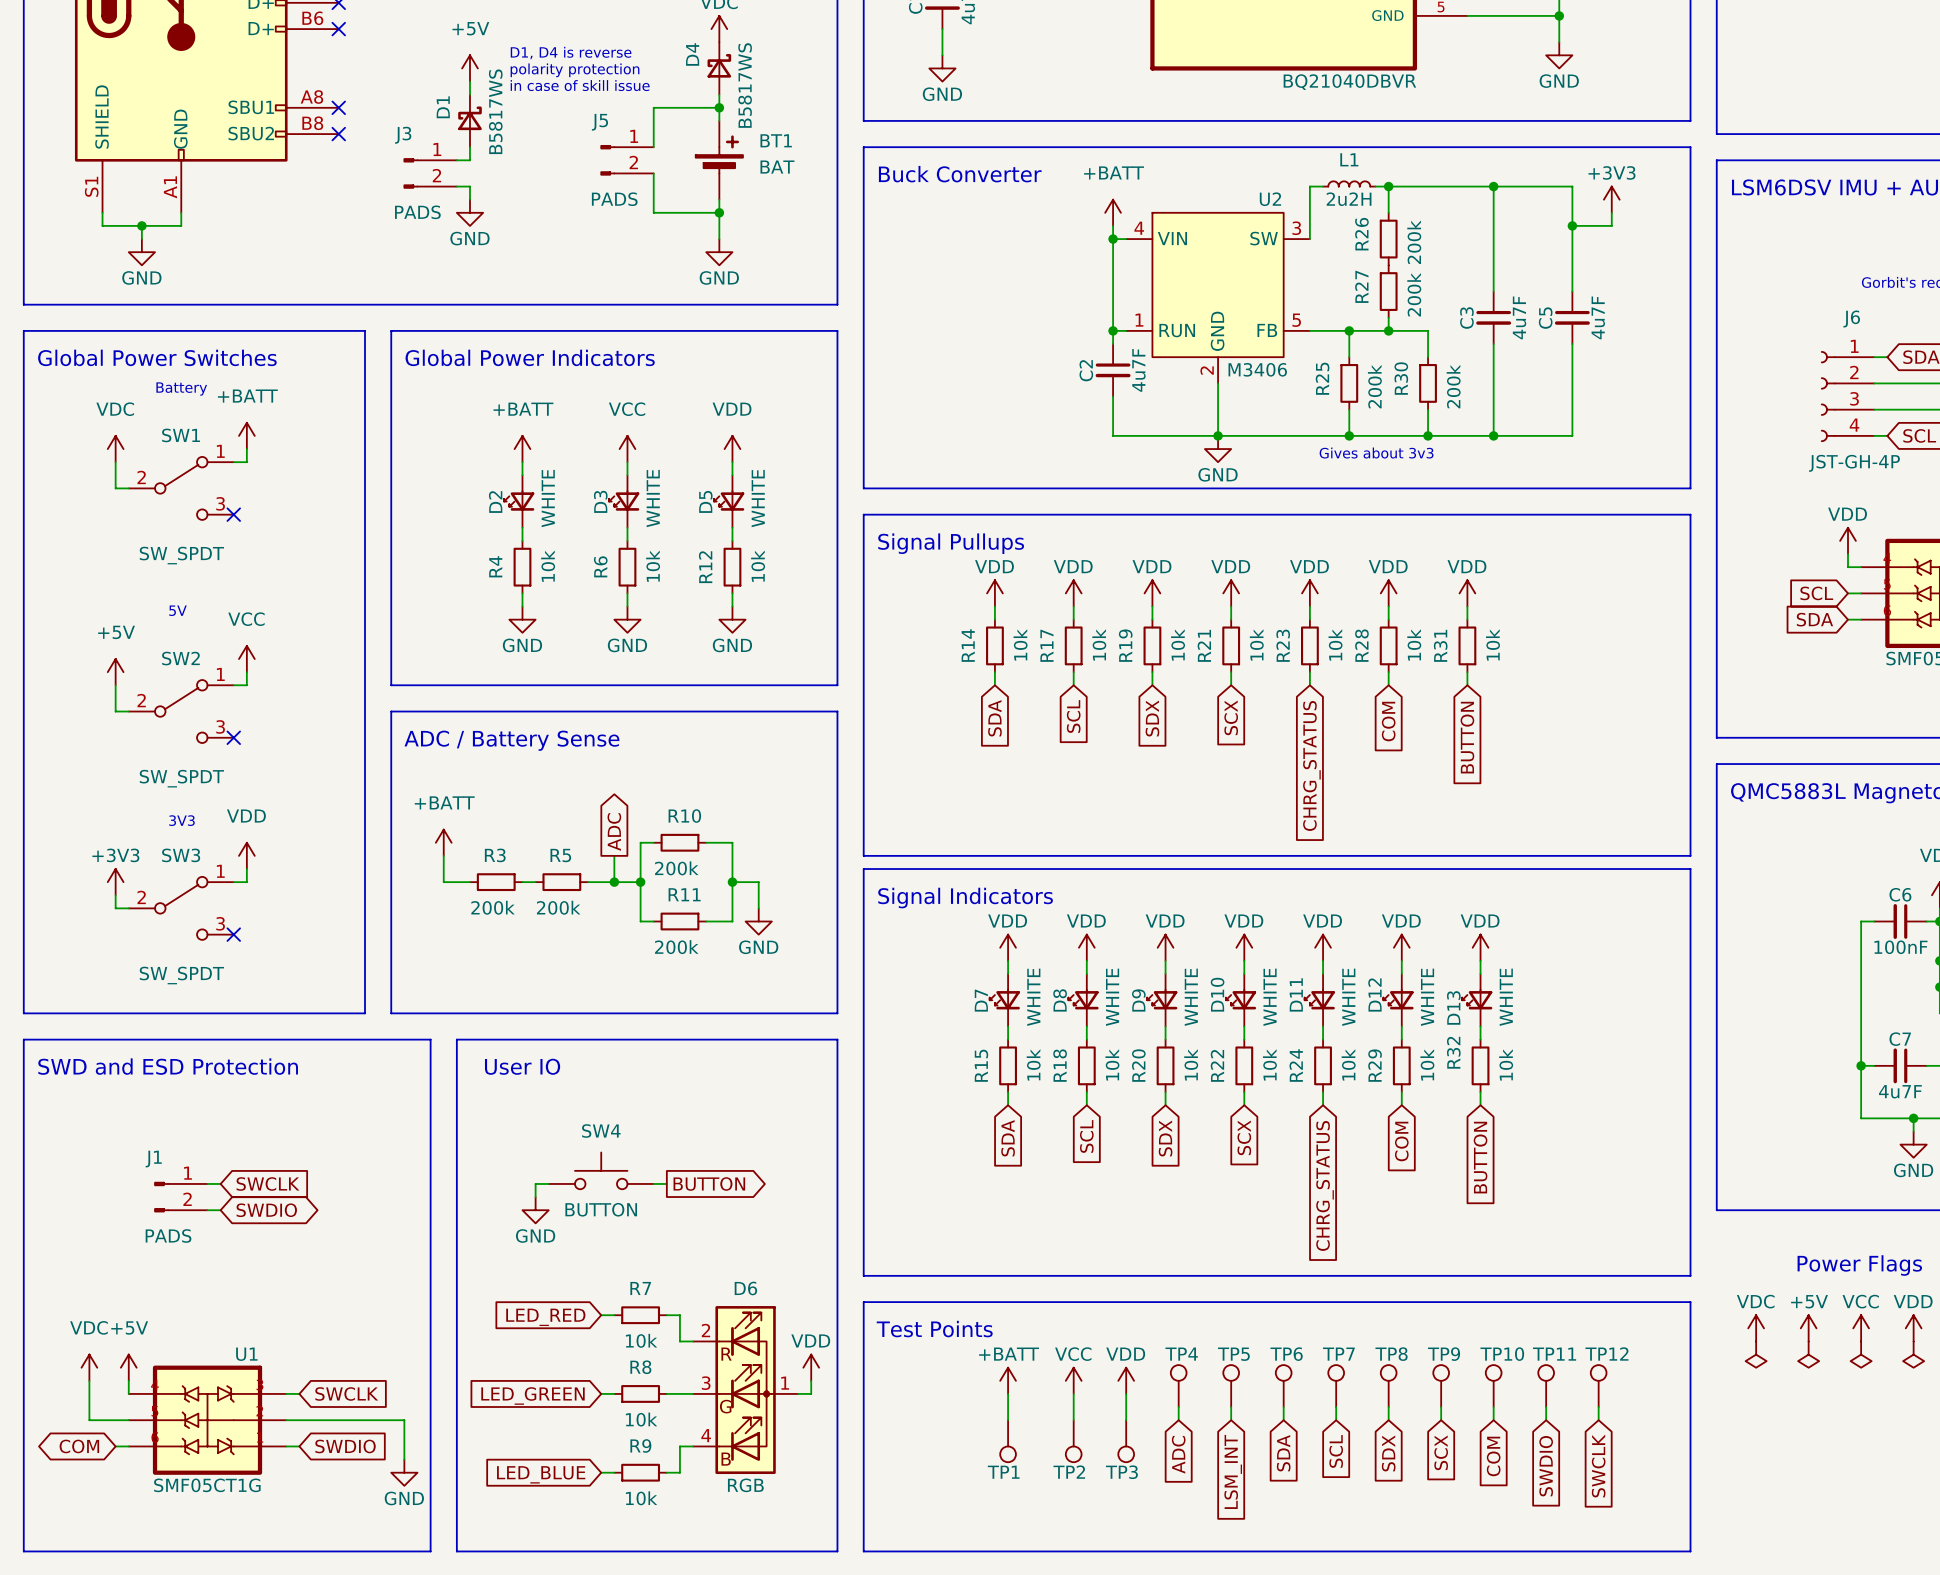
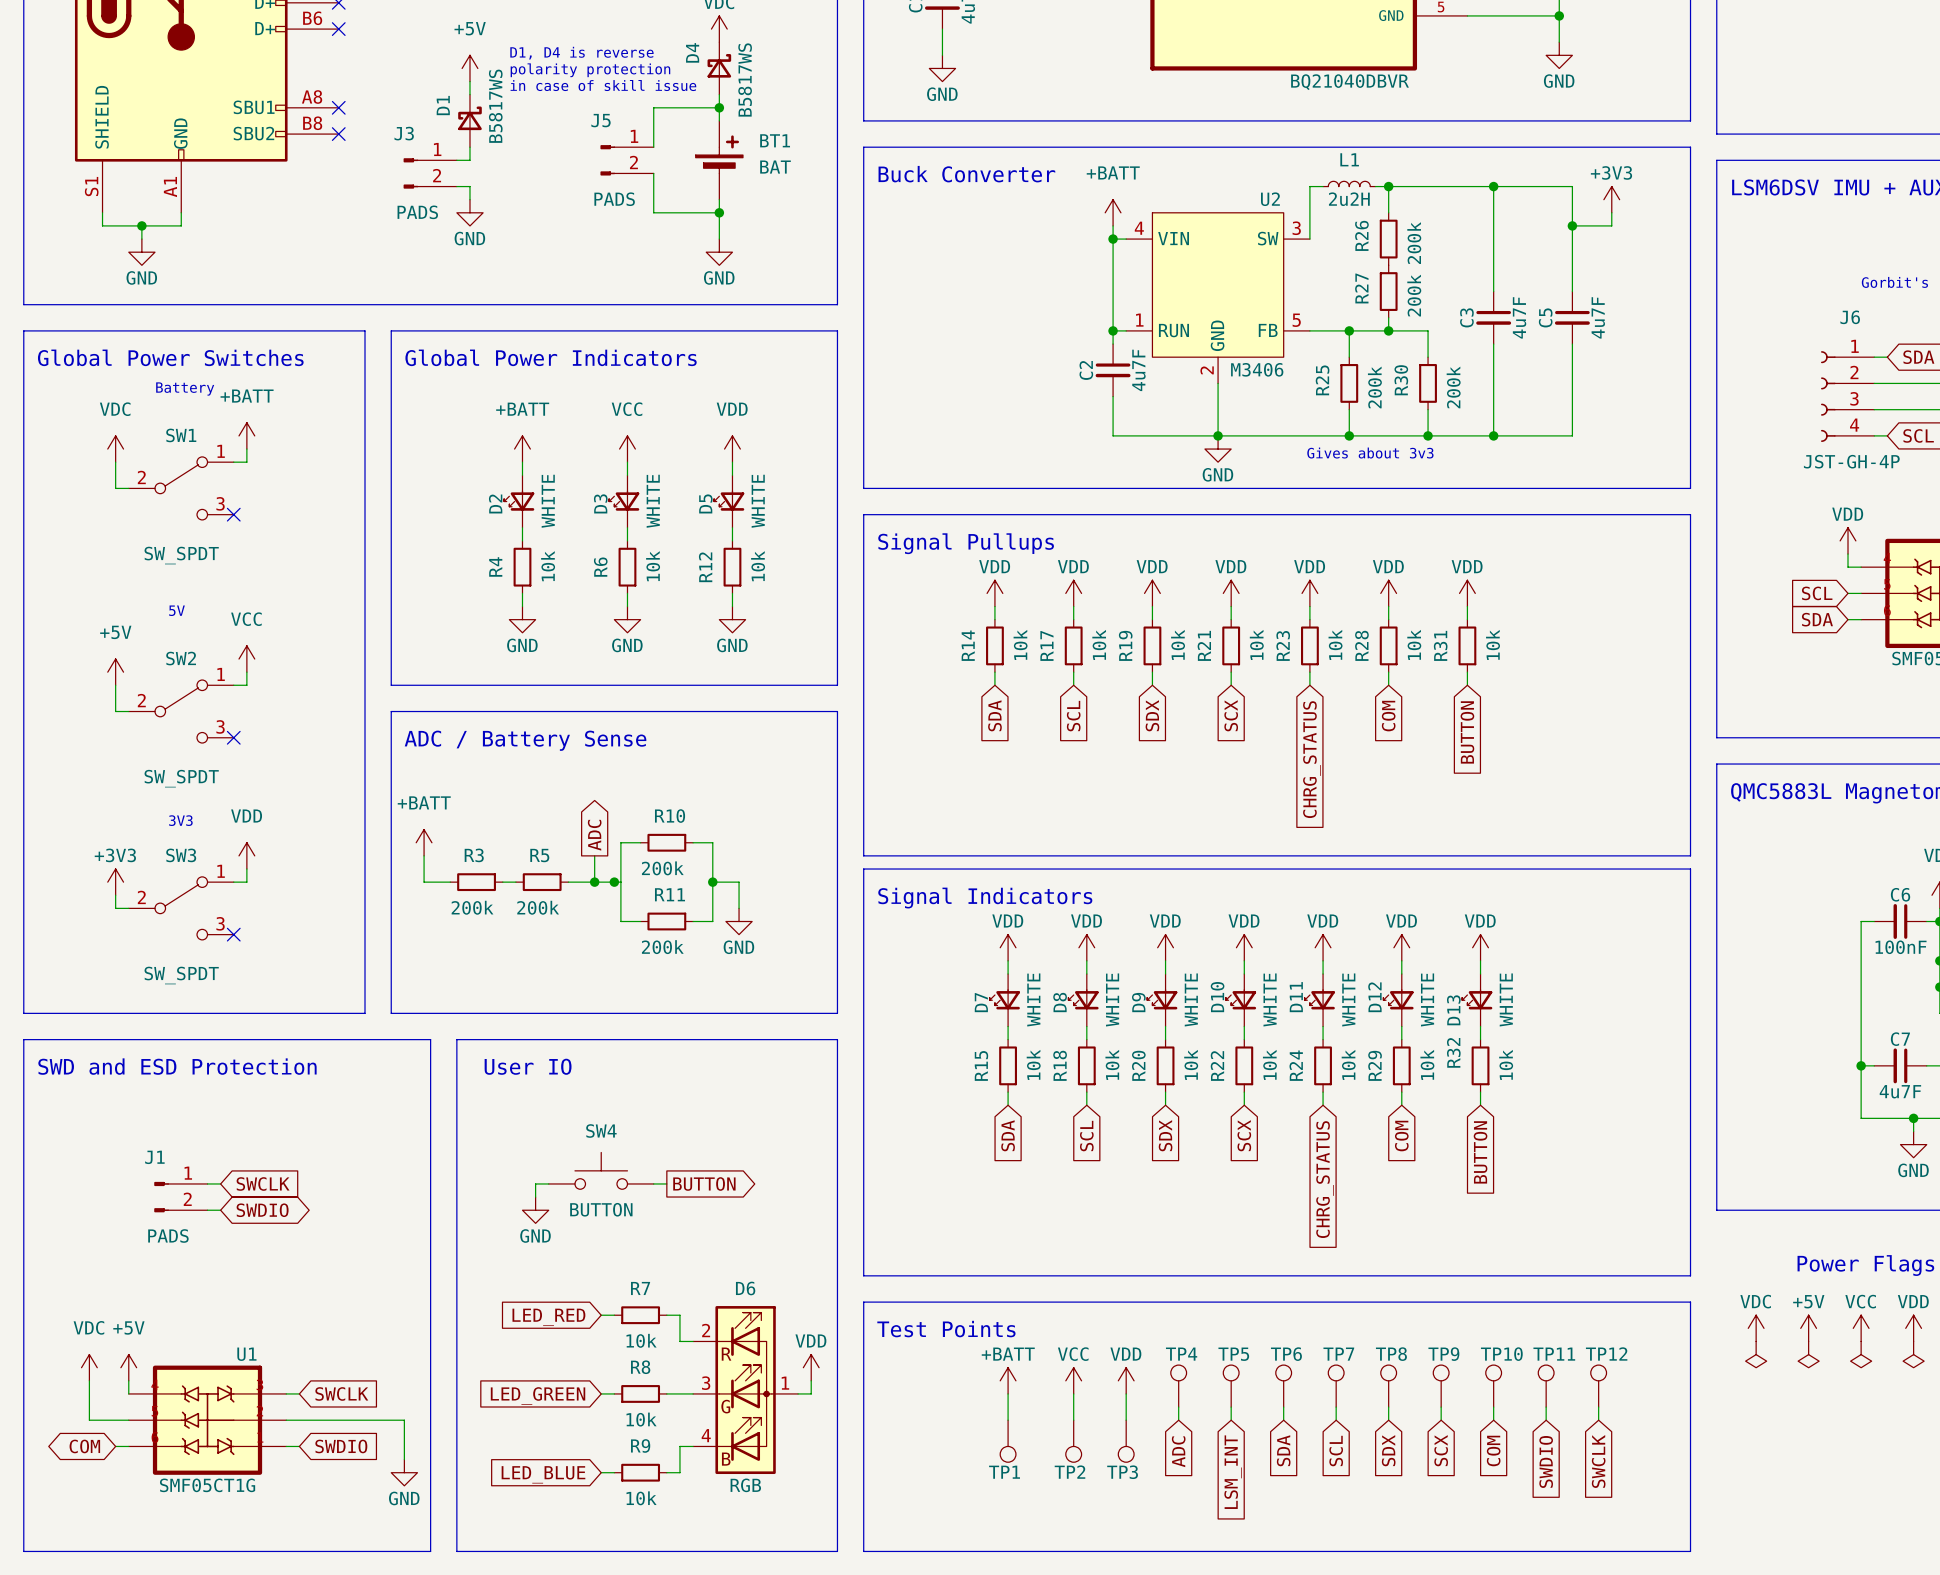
global label position: ADC (614, 832) -> ADC (594, 835)
power symbol position: +BATT (443, 842) -> +BATT (424, 842)
wire: none -> (640, 842) (620, 842) (620, 921) (640, 921)
wire: (653, 842) (640, 842) (640, 921) (653, 921) -> none
R10 position: (679, 842) -> (666, 842)
wire: (712, 842) (732, 842) (732, 921) (712, 921) -> (712, 842) (712, 921)
wire: (443, 855) (443, 882) -> (424, 855) (424, 882) (443, 882)
wire: (614, 855) (614, 882) -> (594, 855) (594, 882)
wire: (450, 882) (469, 882) -> none
R3 position: (496, 882) -> (476, 882)
wire: (522, 882) (535, 882) -> (502, 882) (515, 882)
R5 position: (561, 882) -> (542, 882)
junction: none -> (594, 882)
wire: (620, 882) (640, 882) -> (568, 882) (588, 882)
junction: (640, 882) -> none
wire: none -> (712, 882) (732, 882)
junction position: (732, 882) -> (712, 882)
wire: (739, 882) (758, 882) (758, 908) -> (739, 882) (739, 908)
R11 position: (679, 921) -> (666, 921)
power symbol position: GND (758, 921) -> GND (739, 921)

